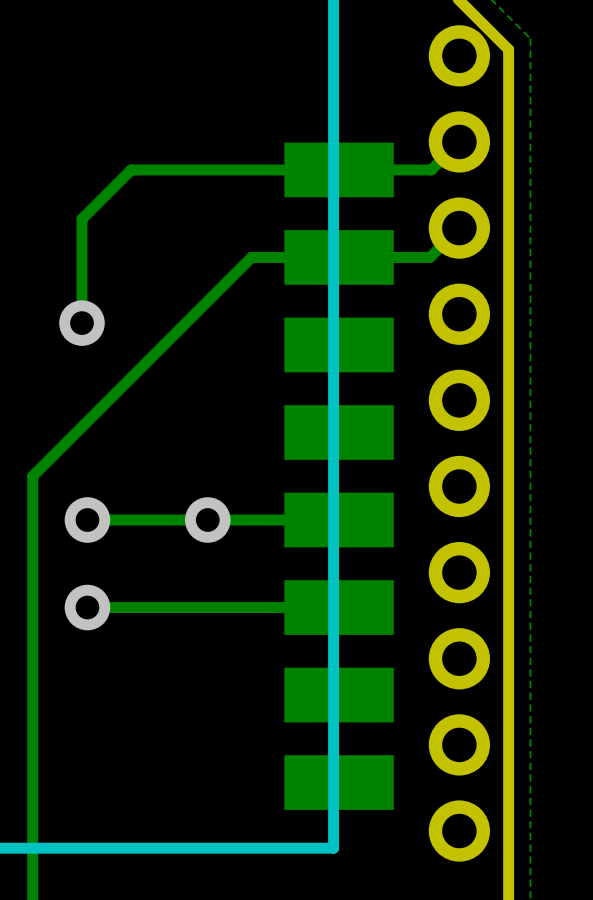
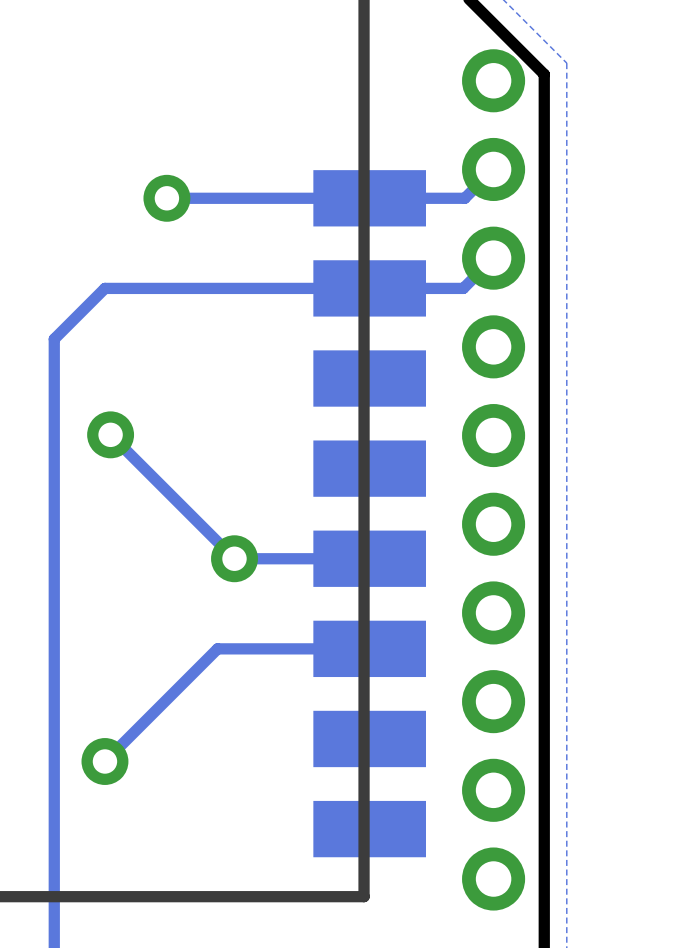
track: (142, 169) (131, 169) (81, 219) (81, 323) -> none
via: none -> (166, 198)
track: (251, 257) (32, 476) -> (279, 288) (104, 288) (54, 339) (54, 513)
via: (81, 323) -> none
via: none -> (110, 434)
via: (87, 520) -> none
track: (207, 520) (87, 520) -> (234, 558) (110, 434)
via: (87, 607) -> none
track: (191, 607) (87, 607) -> (217, 648) (104, 761)
via: none -> (104, 761)

